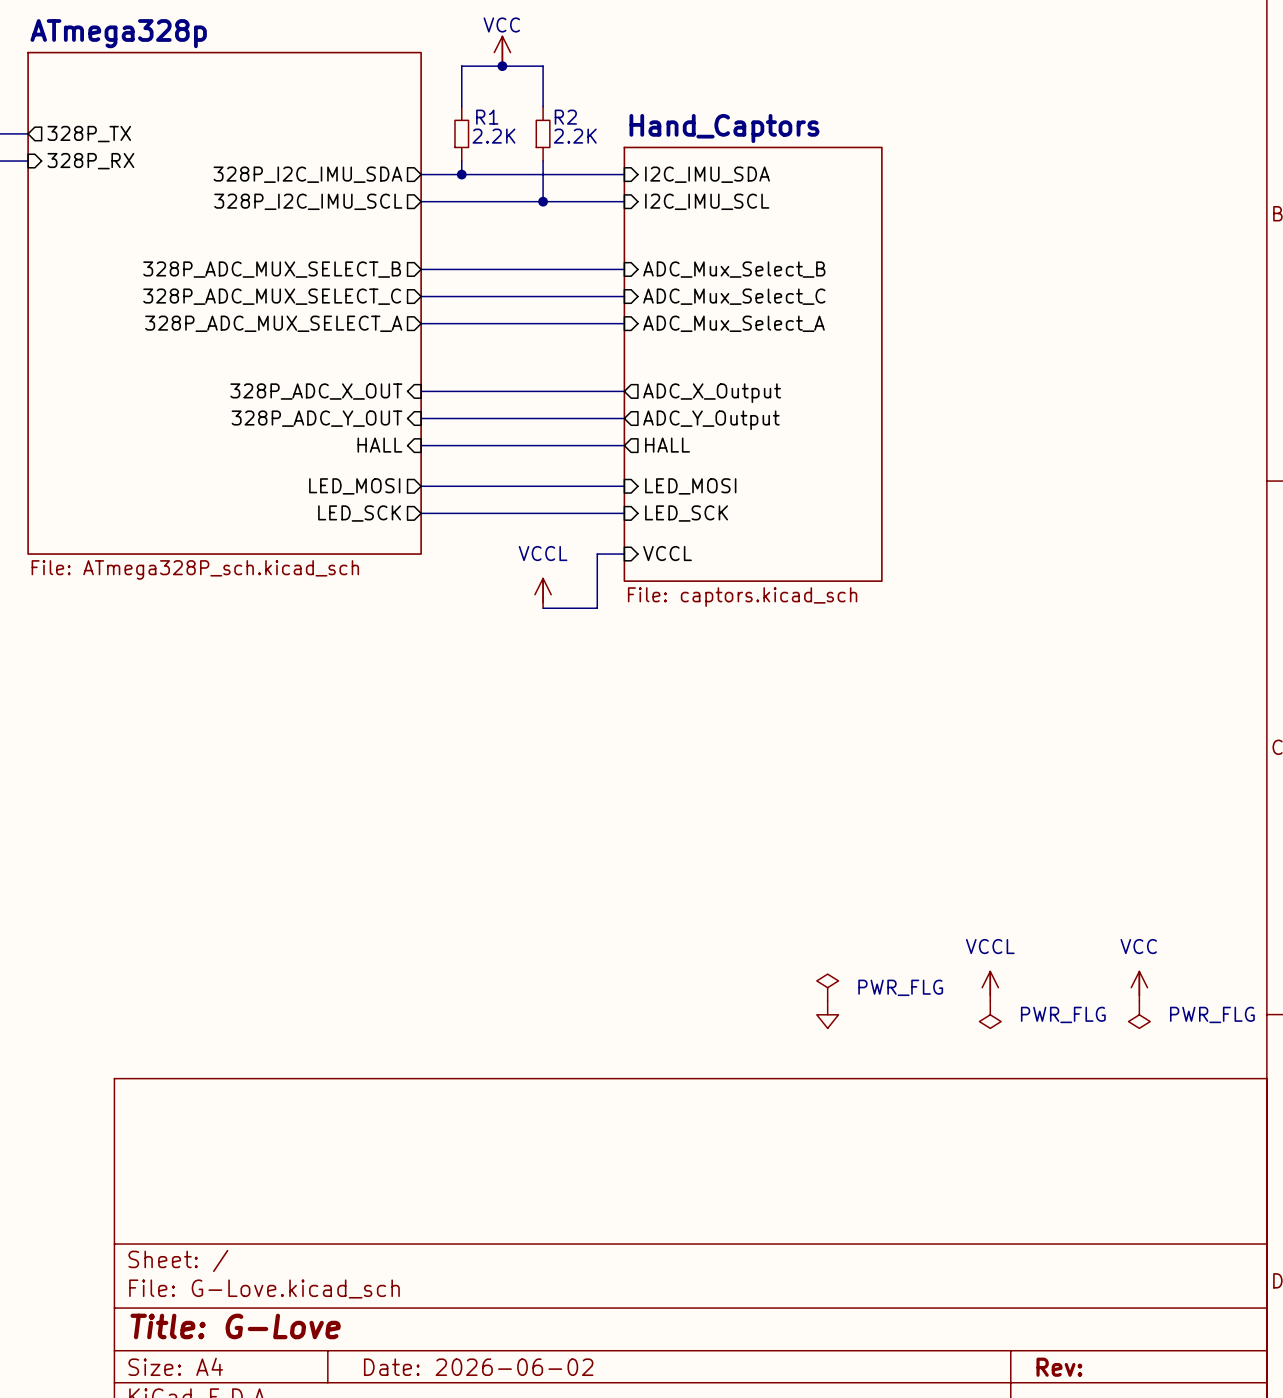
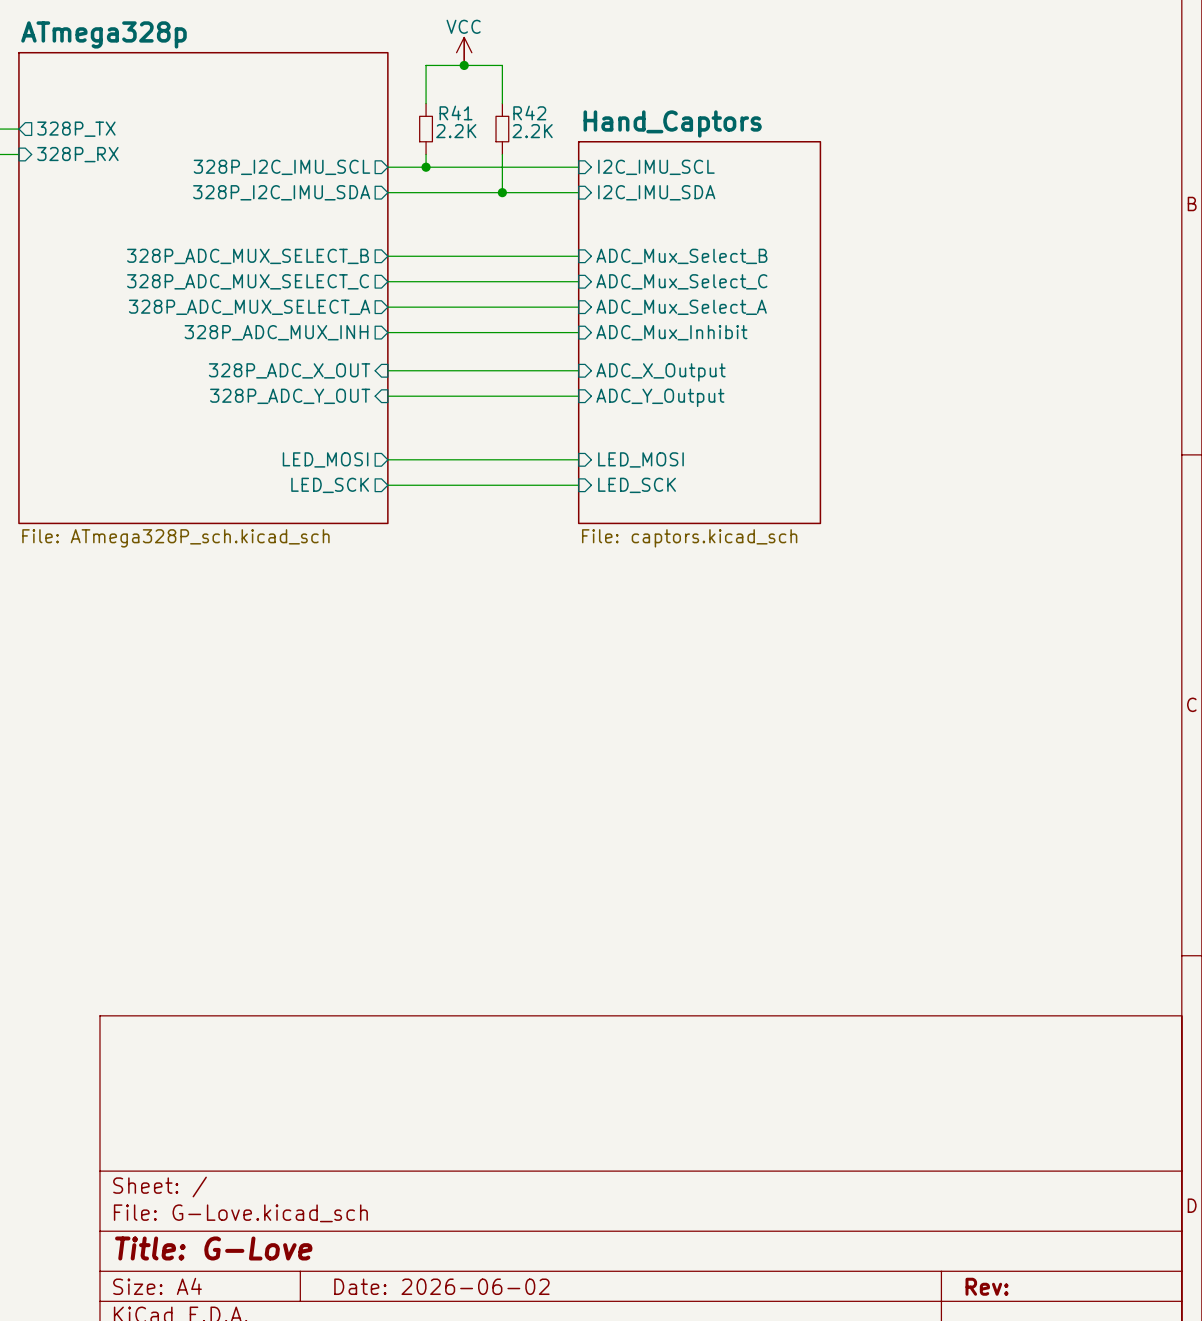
R1 name: R1 (487, 117) -> R41 (456, 113)
R2 name: R2 (565, 117) -> R42 (529, 113)
sheet pin: 328P_I2C_IMU_SDA (307, 174) -> 328P_I2C_IMU_SCL (281, 167)
sheet pin: I2C_IMU_SDA (707, 174) -> I2C_IMU_SCL (656, 167)
sheet pin: 328P_I2C_IMU_SCL (308, 201) -> 328P_I2C_IMU_SDA (281, 192)
sheet pin: I2C_IMU_SCL (707, 201) -> I2C_IMU_SDA (656, 192)
sheet pin: none -> 328P_ADC_MUX_INH (276, 332)
sheet pin: none -> ADC_Mux_Inhibit (671, 332)
sheet Hand_Captors: none -> File: captors.kicad_sch (699, 332)
sheet Hand_Captors: File: captors.kicad_sch (753, 364) -> none
sheet pin shape: output (712, 393) -> input (660, 372)
sheet pin shape: output (711, 420) -> input (660, 397)
sheet pin: HALL (379, 445) -> none
wire: (421, 445) (624, 445) -> (387, 332) (578, 332)
sheet pin: HALL (667, 445) -> none
sheet pin: VCCL (667, 553) -> none
wire: (624, 554) (597, 554) (597, 608) (543, 608) -> none
power symbol: VCCL (543, 593) -> none
power symbol: VCCL (990, 986) -> none
power symbol: VCC (1139, 986) -> none
power symbol: PWR_FLG (827, 987) -> none
power symbol: (827, 1014) -> none
power symbol: PWR_FLG (990, 1014) -> none
power symbol: PWR_FLG (1139, 1014) -> none

